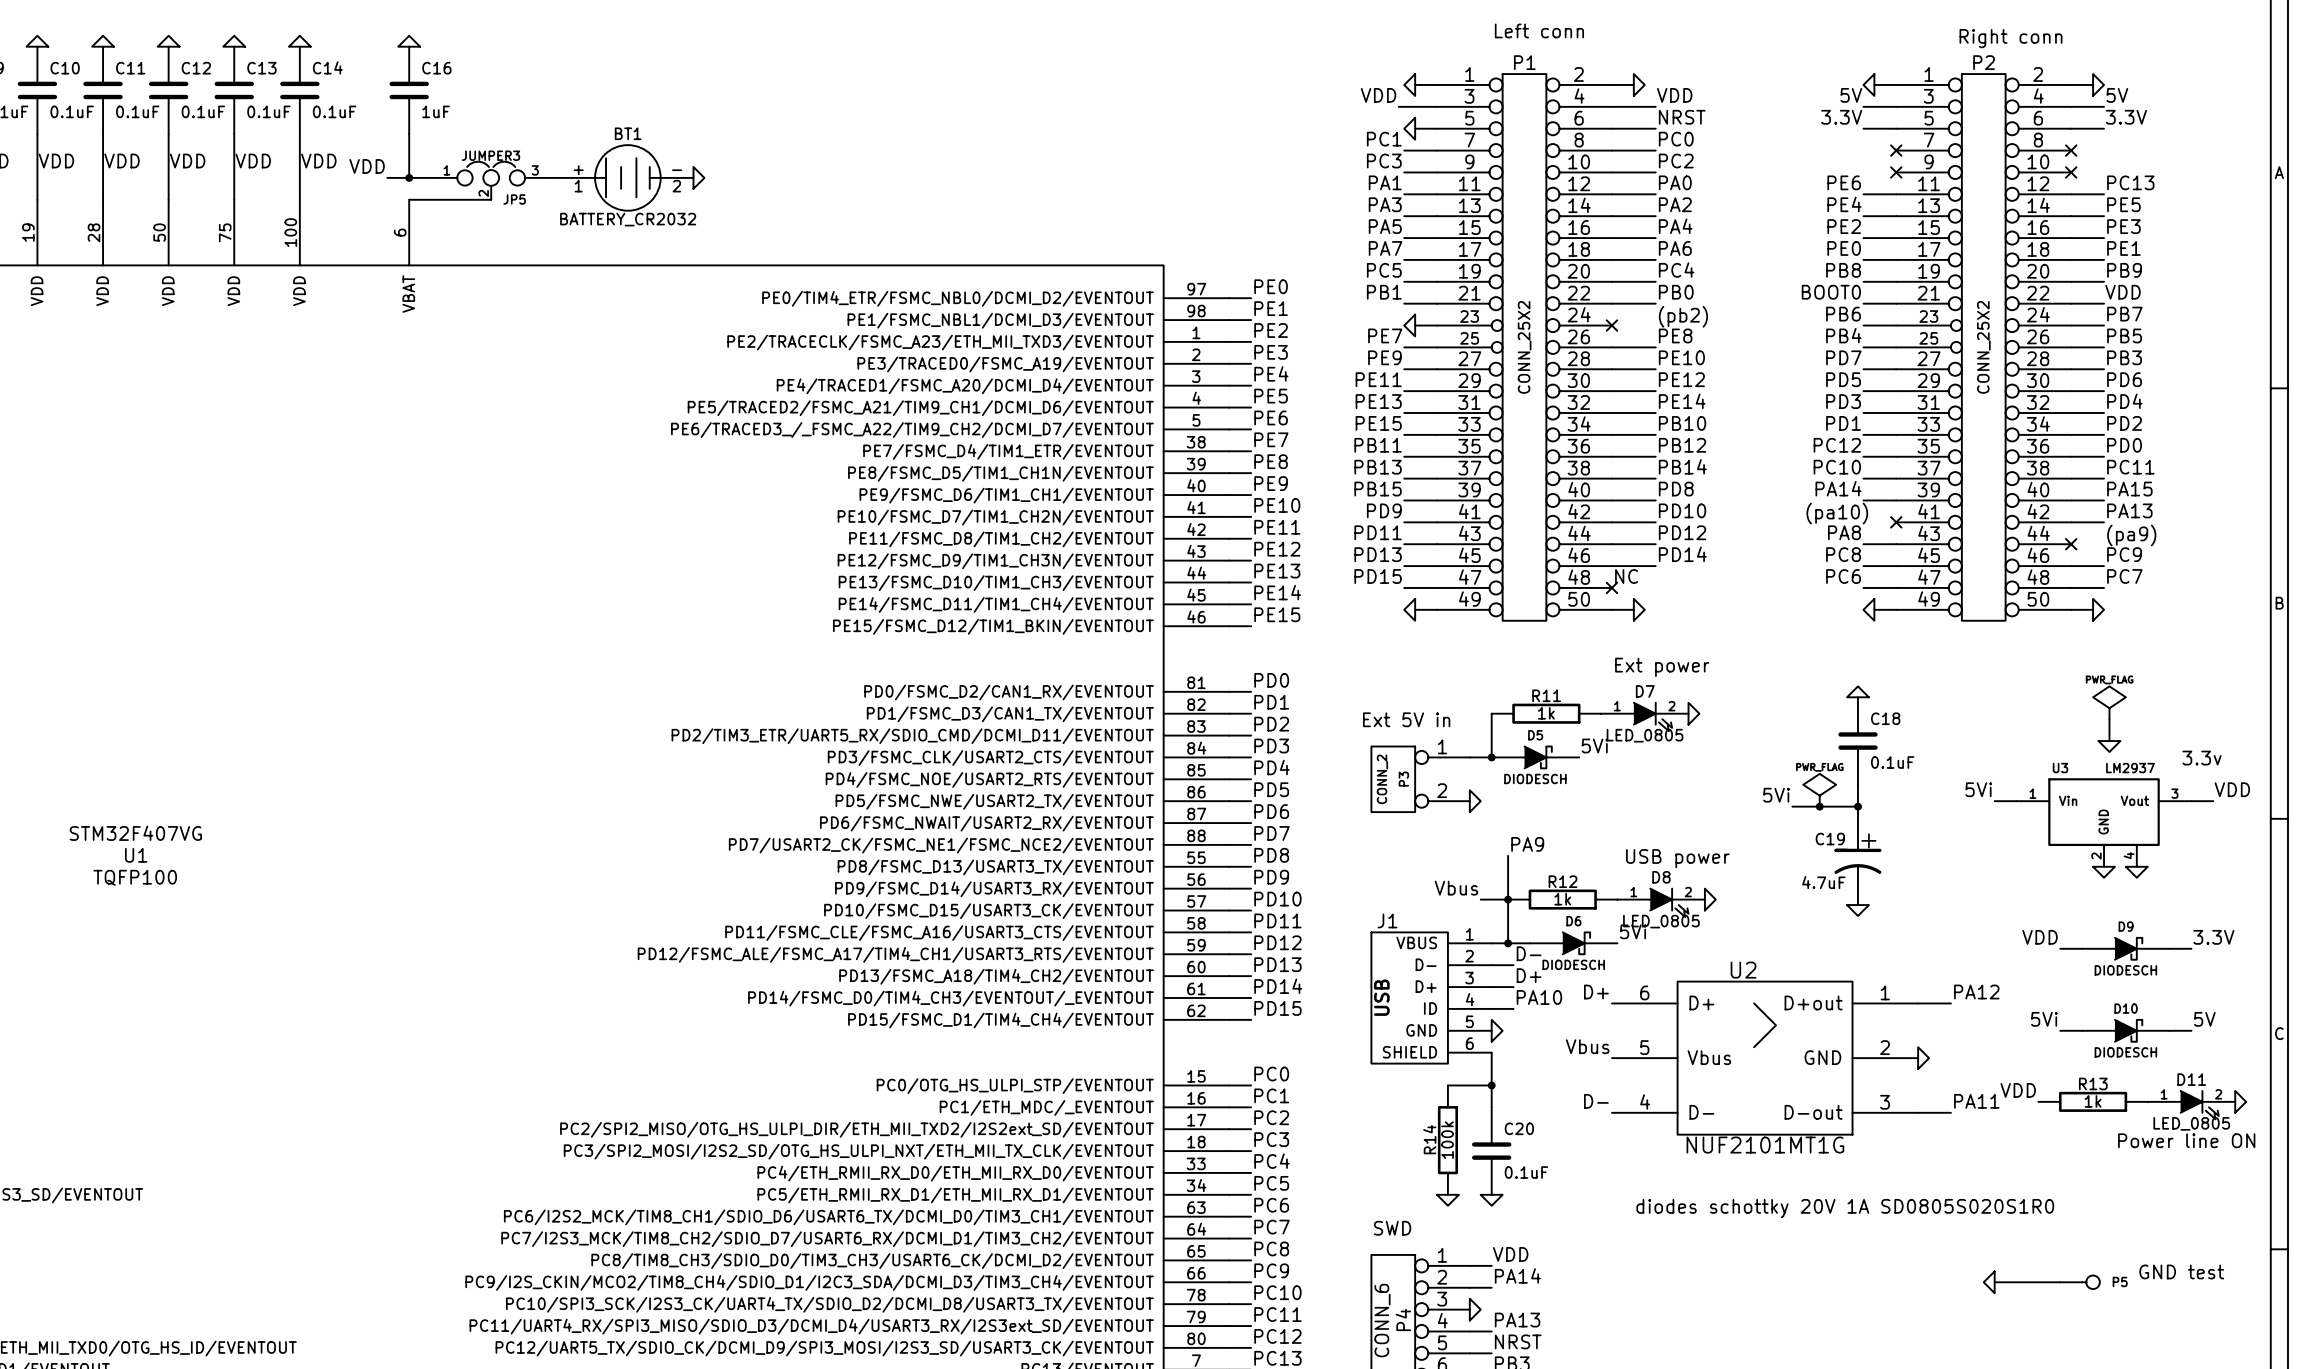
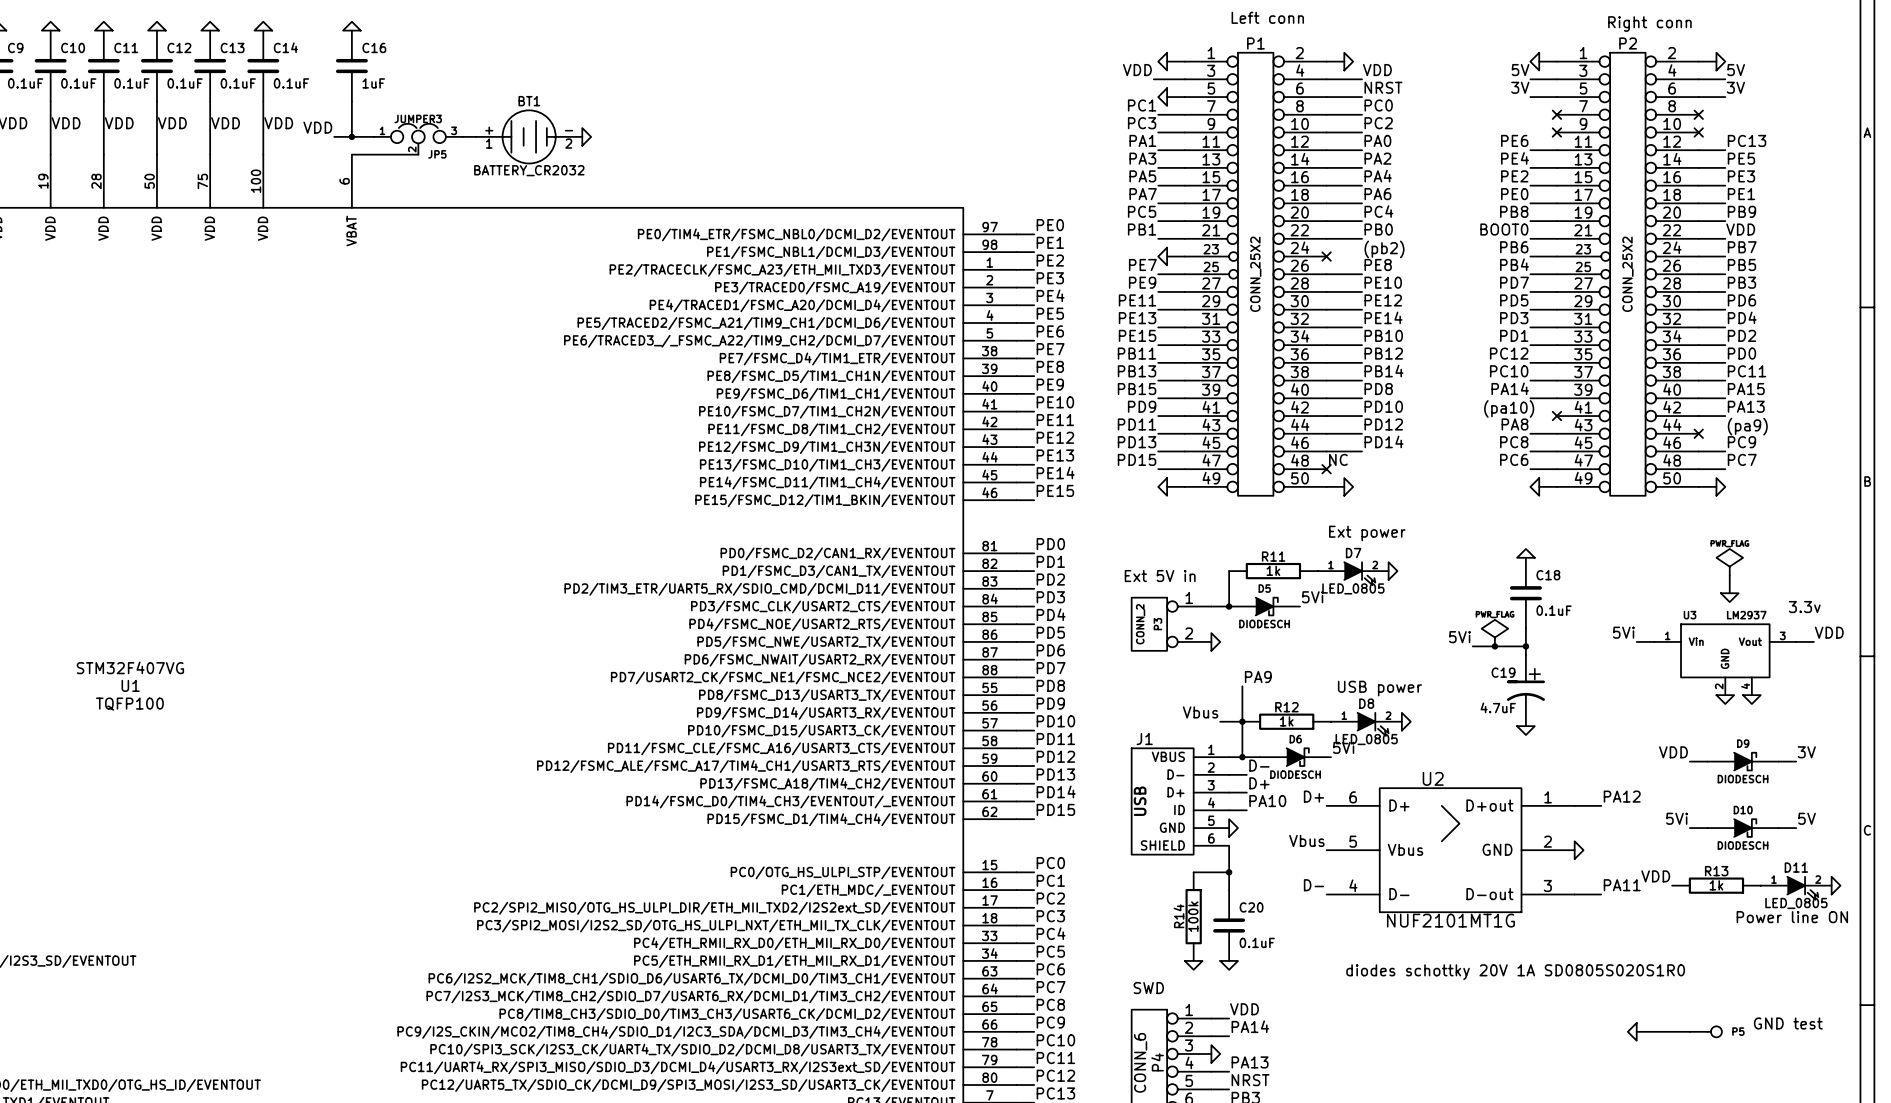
label: 3.3V (1841, 117) -> 3V (1520, 87)
label: 3.3V (2126, 117) -> 3V (1735, 87)
label: 3.3V (2213, 937) -> 3V (1806, 752)

